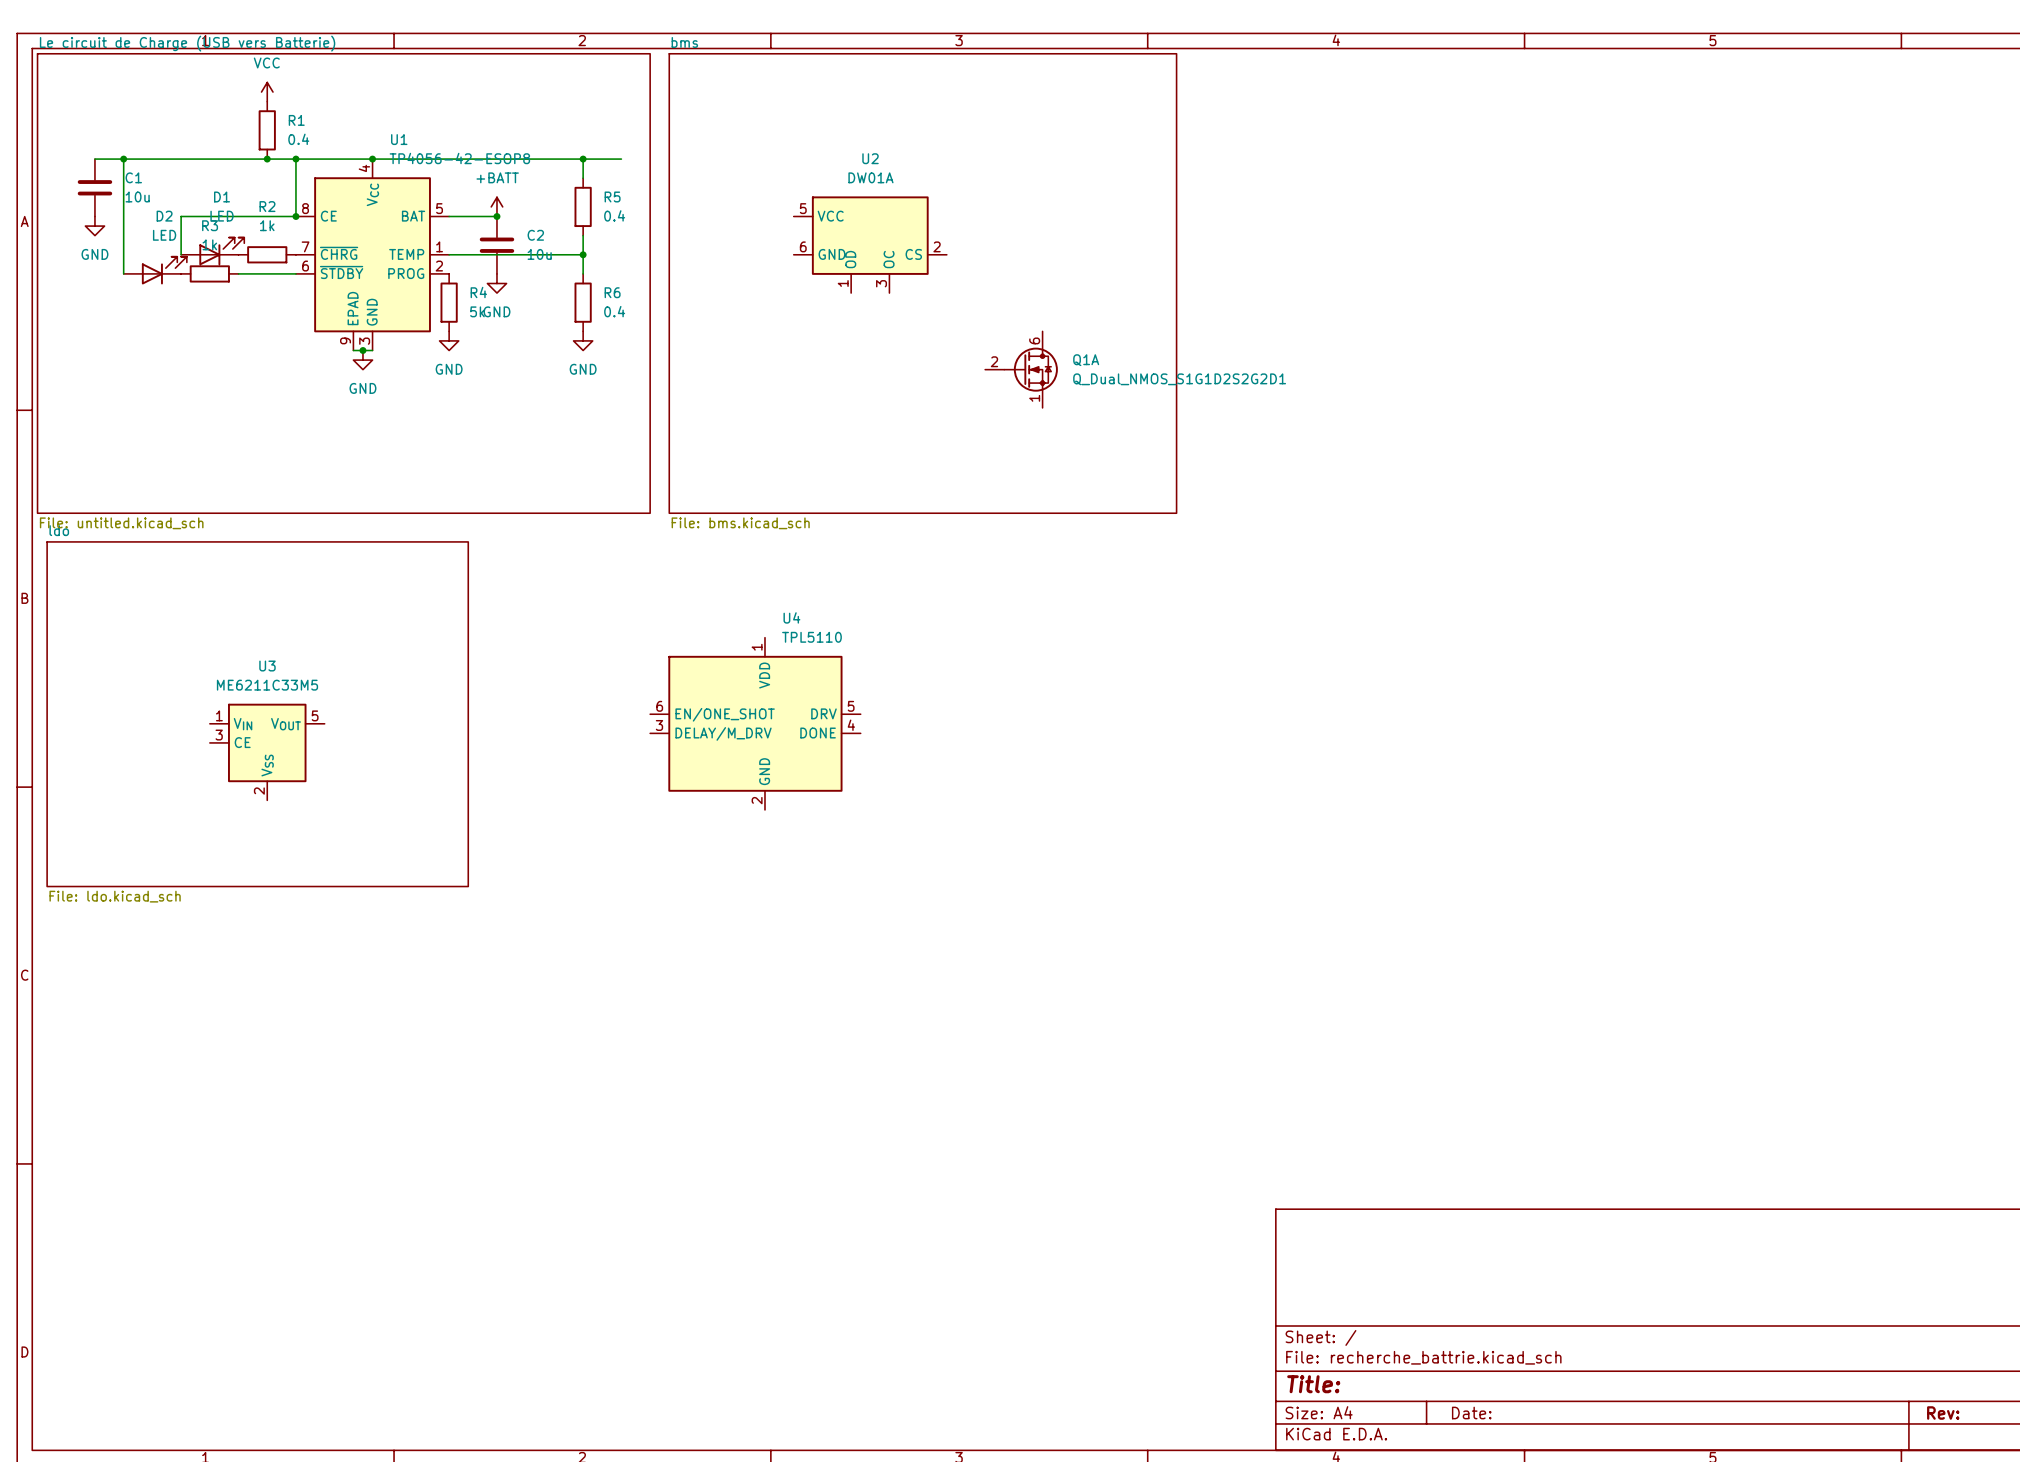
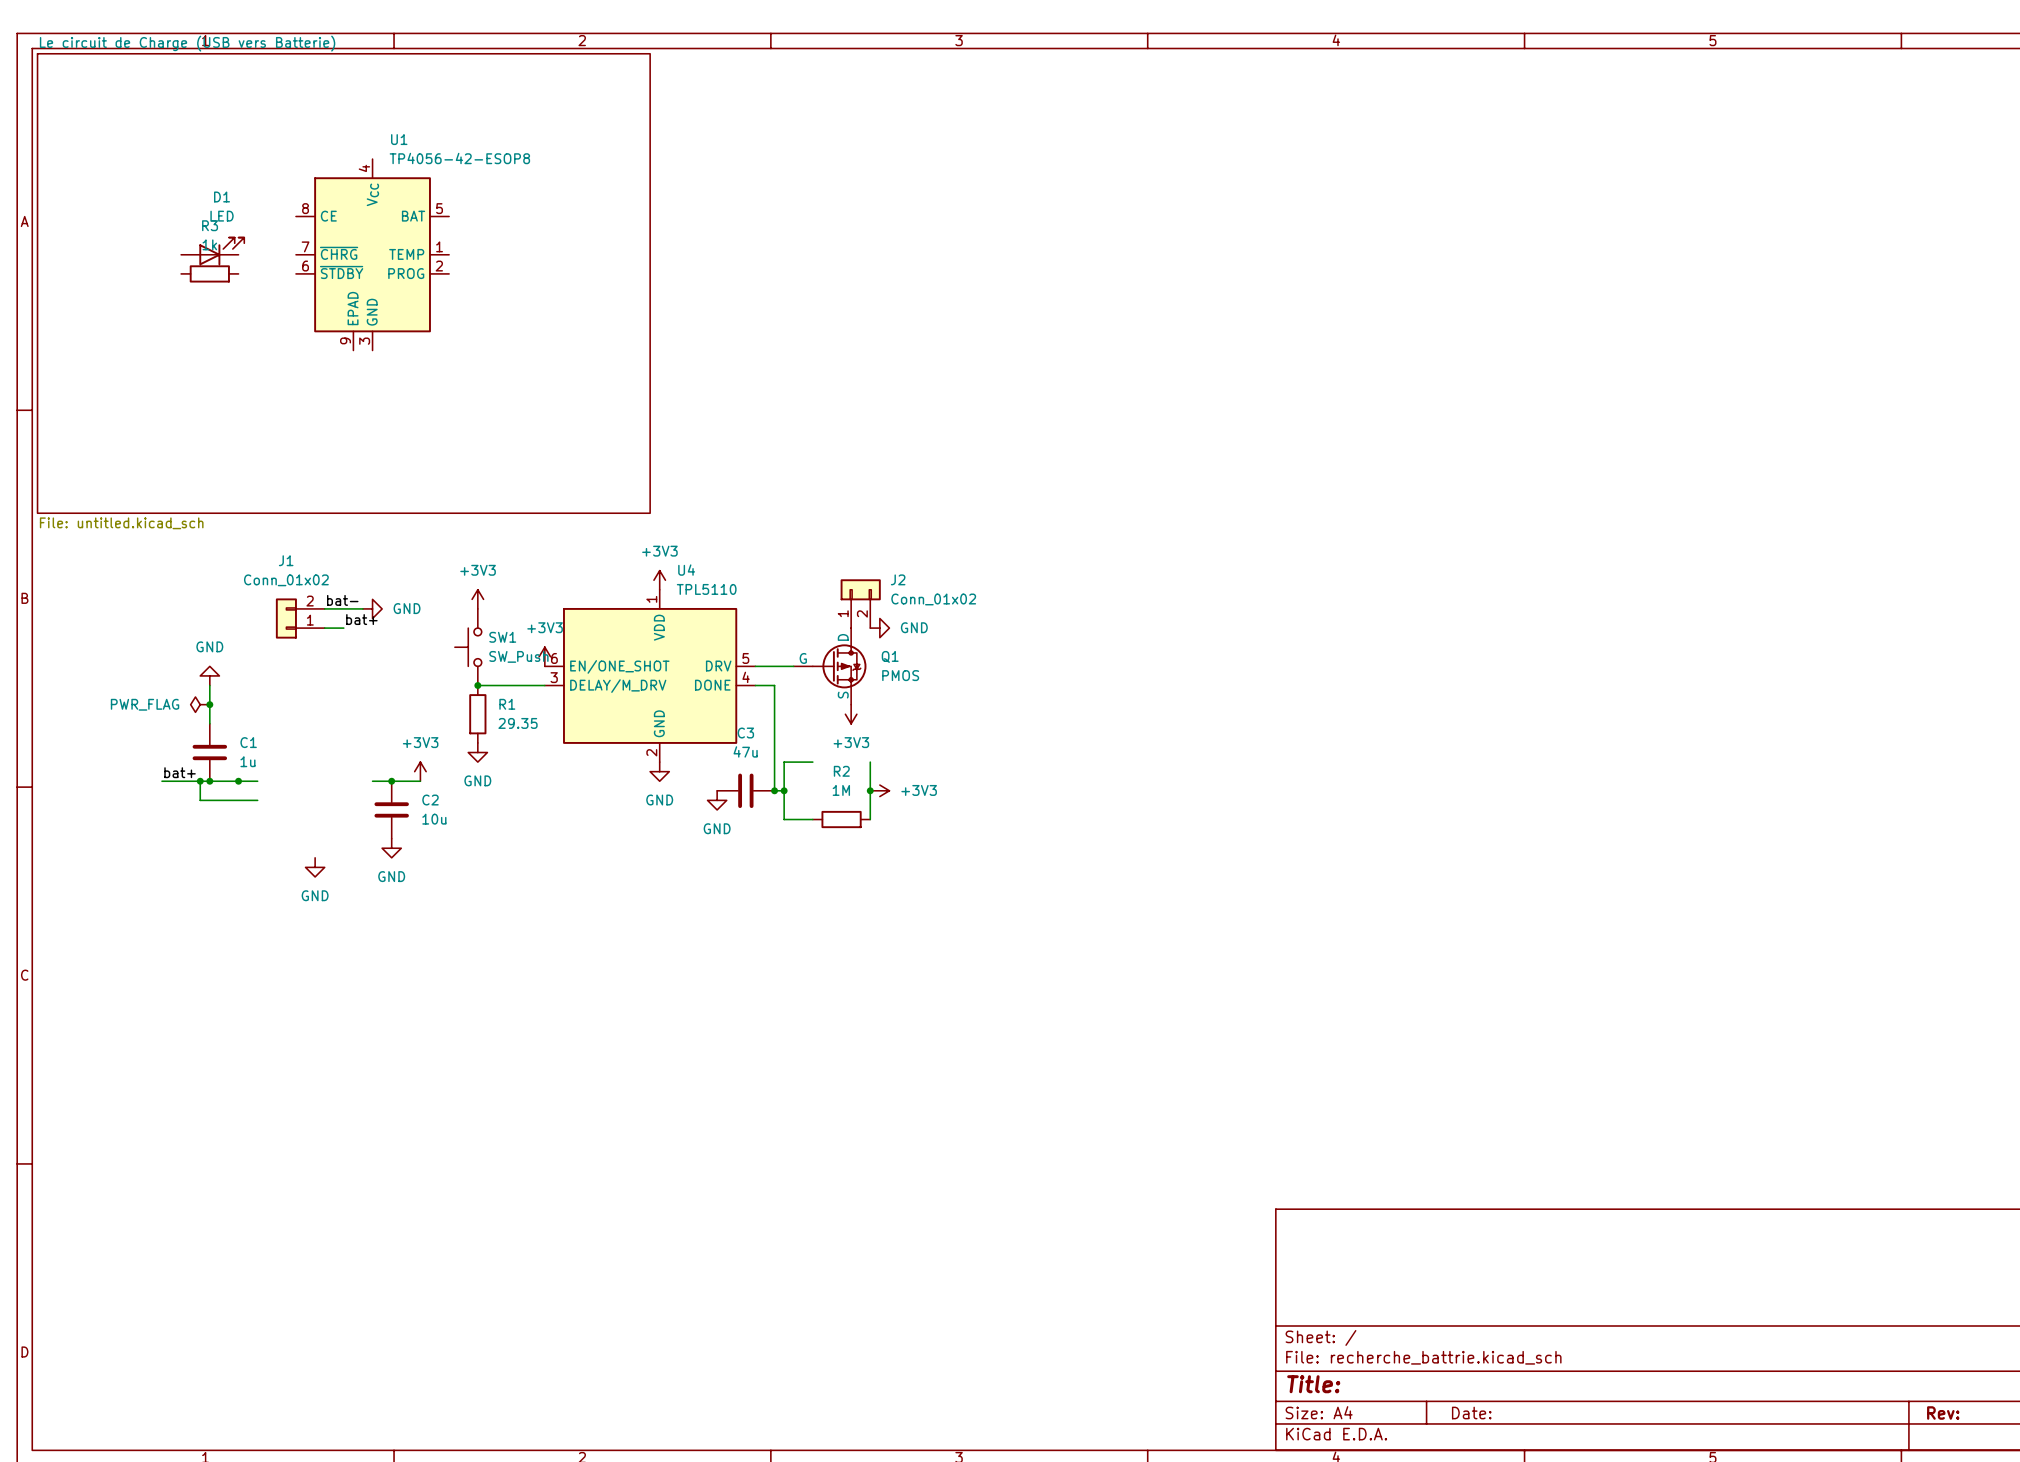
power symbol: VCC (267, 92) -> none
R1 position: (267, 130) -> (477, 714)
R1 value: 0.4 (298, 139) -> 29.35 (518, 723)
wire: (94, 159) (621, 159) -> none
wire: (123, 159) (123, 273) -> none
junction: (123, 159) -> none
junction: (267, 159) -> none
wire: (295, 159) (295, 216) (181, 216) (181, 254) -> none
junction: (295, 159) -> none
junction: (372, 159) -> none
wire: (583, 159) (583, 178) -> none
junction: (583, 159) -> none
C1 position: (94, 187) -> (209, 752)
C1 value: 10u (137, 197) -> 1u (247, 761)
power symbol: +BATT (496, 206) -> none
R5: 0.4 (583, 206) -> none
junction: (295, 216) -> none
wire: (449, 216) (496, 216) -> none
junction: (496, 216) -> none
R2 value: 1k (267, 225) -> 1M (841, 790)
power symbol: GND (94, 226) -> none
wire: (583, 235) (583, 273) -> none
U2: DW01A (870, 244) -> none
C2 position: (496, 245) -> (391, 809)
R2 position: (267, 254) -> (841, 819)
wire: (449, 254) (583, 254) -> none
junction: (583, 254) -> none
D2: LED (155, 270) -> none
wire: (238, 273) (295, 273) -> none
power symbol: GND (496, 283) -> none
sheet bms: File: bms.kicad_sch (922, 283) -> none
R4: 5k (449, 302) -> none
R6: 0.4 (583, 302) -> none
power symbol: GND (449, 340) -> none
power symbol: GND (583, 340) -> none
wire: (353, 350) (372, 350) -> none
junction: (362, 350) -> none
power symbol: GND (362, 360) -> none
Q1A: Q_Dual_NMOS_S1G1D2S2G2D1 (1021, 369) -> none
power symbol: none -> +3V3 (659, 580)
power symbol: none -> +3V3 (477, 599)
label: none -> bat- (342, 600)
J2: none -> Conn_01x02 (860, 603)
wire: none -> (324, 608) (362, 608)
power symbol: none -> GND (372, 608)
J1: none -> Conn_01x02 (300, 618)
label: none -> bat+ (361, 619)
wire: none -> (324, 628) (343, 628)
power symbol: none -> GND (879, 628)
SW1: none -> SW_Push (468, 647)
power symbol: none -> +3V3 (544, 656)
Q1: none -> PMOS (830, 666)
power symbol: none -> GND (209, 675)
wire: none -> (209, 685) (209, 723)
wire: none -> (477, 685) (544, 685)
junction: none -> (477, 685)
power symbol: none -> PWR_FLAG (200, 704)
junction: none -> (209, 704)
sheet ldo: File: ldo.kicad_sch (257, 714) -> none
power symbol: none -> +3V3 (851, 714)
U4 position: (755, 723) -> (650, 675)
U3: ME6211C33M5 (267, 752) -> none
power symbol: none -> GND (477, 752)
wire: none -> (812, 762) (784, 762) (784, 819) (812, 819)
wire: none -> (870, 762) (870, 819)
power symbol: none -> +3V3 (420, 771)
power symbol: none -> GND (659, 771)
label: none -> bat+ (180, 772)
wire: none -> (161, 781) (257, 781)
wire: none -> (200, 781) (200, 800) (257, 800)
junction: none -> (200, 781)
junction: none -> (209, 781)
junction: none -> (238, 781)
wire: none -> (372, 781) (420, 781)
junction: none -> (391, 781)
C3: none -> 47u (745, 790)
junction: none -> (774, 790)
junction: none -> (784, 790)
junction: none -> (870, 790)
power symbol: none -> +3V3 (879, 790)
power symbol: none -> GND (717, 800)
power symbol: none -> GND (391, 848)
power symbol: none -> GND (315, 867)

